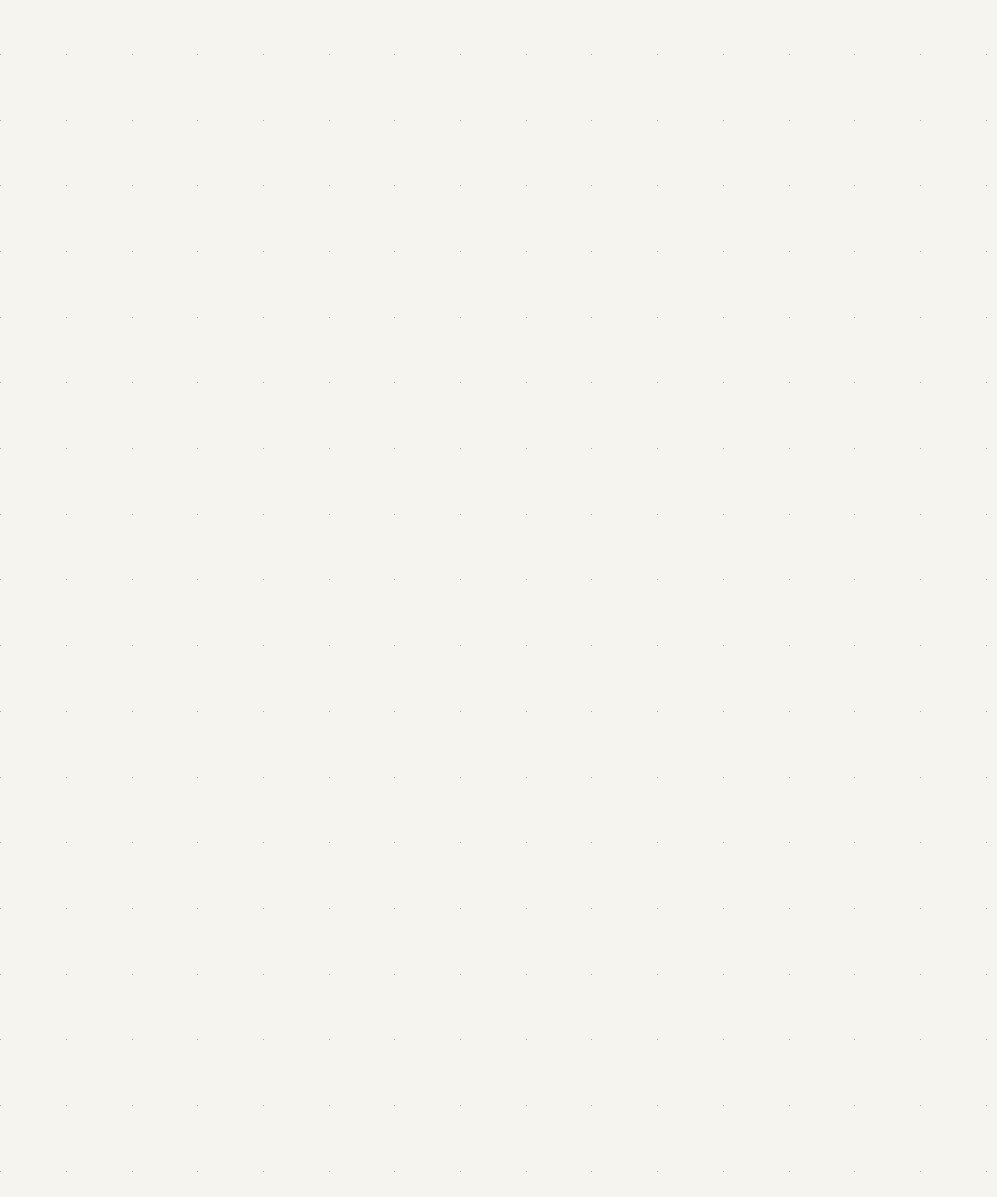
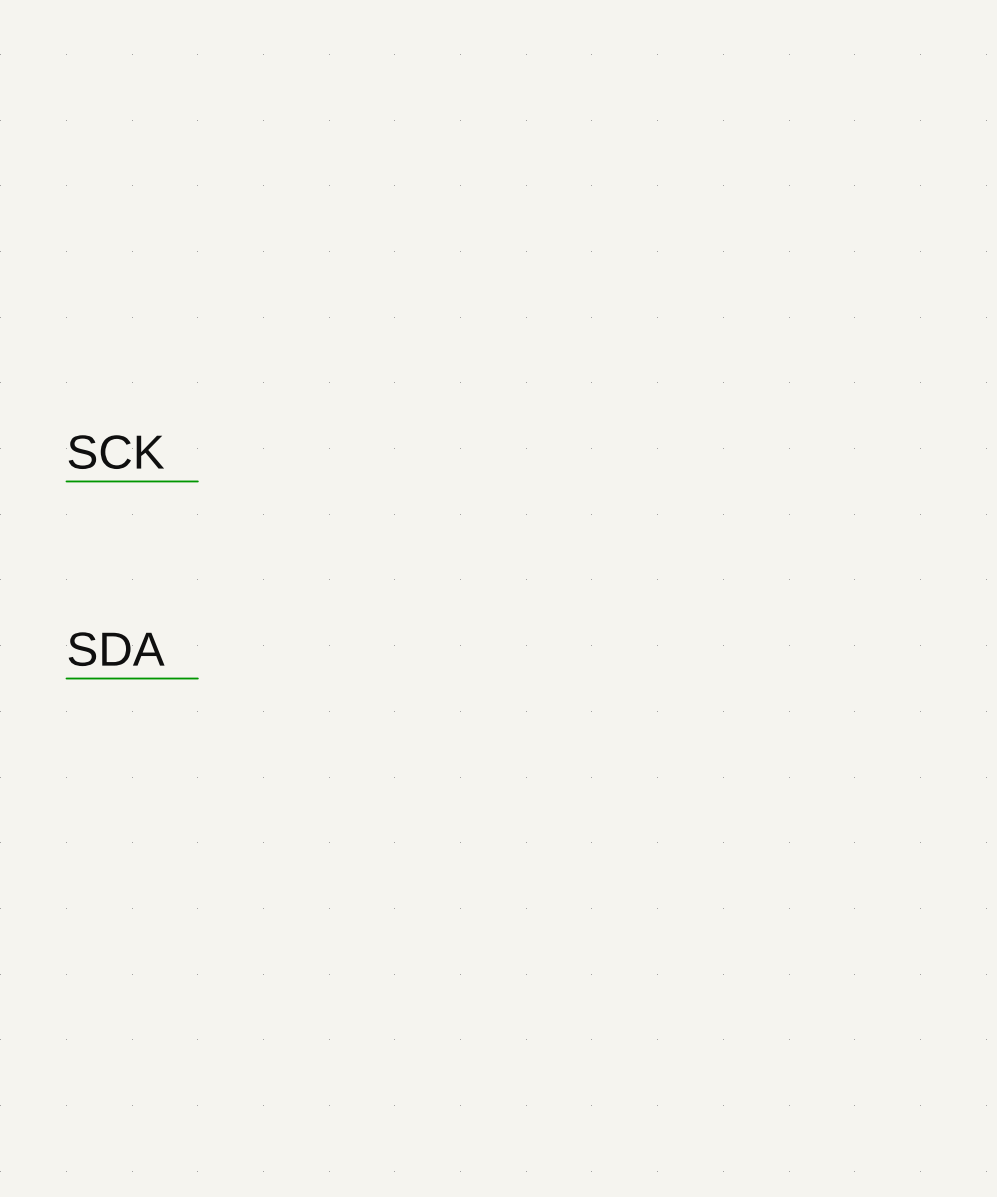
label: none -> SCK (116, 452)
wire: none -> (66, 481) (197, 481)
label: none -> SDA (116, 649)
wire: none -> (66, 678) (197, 678)

